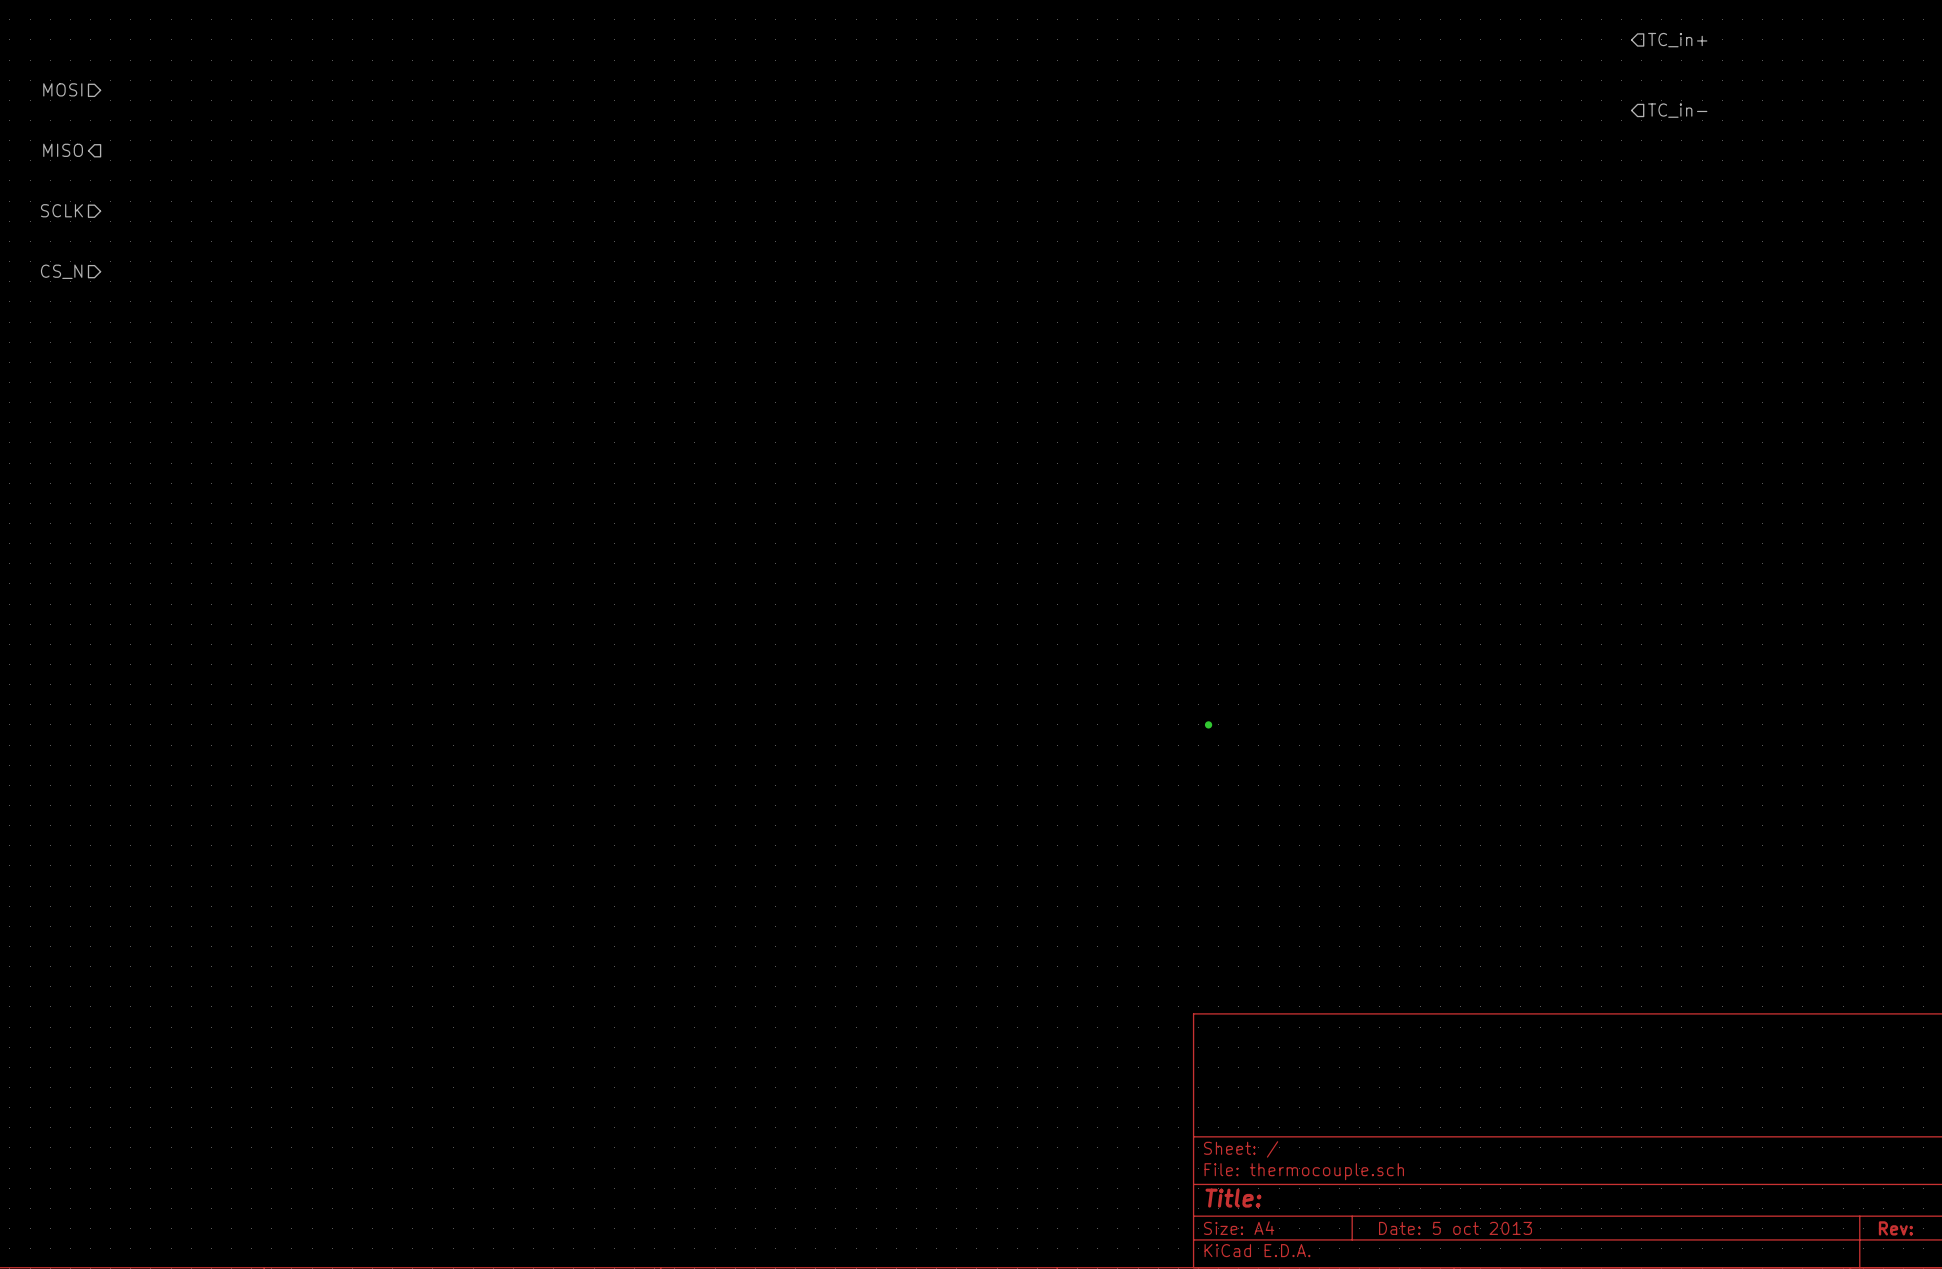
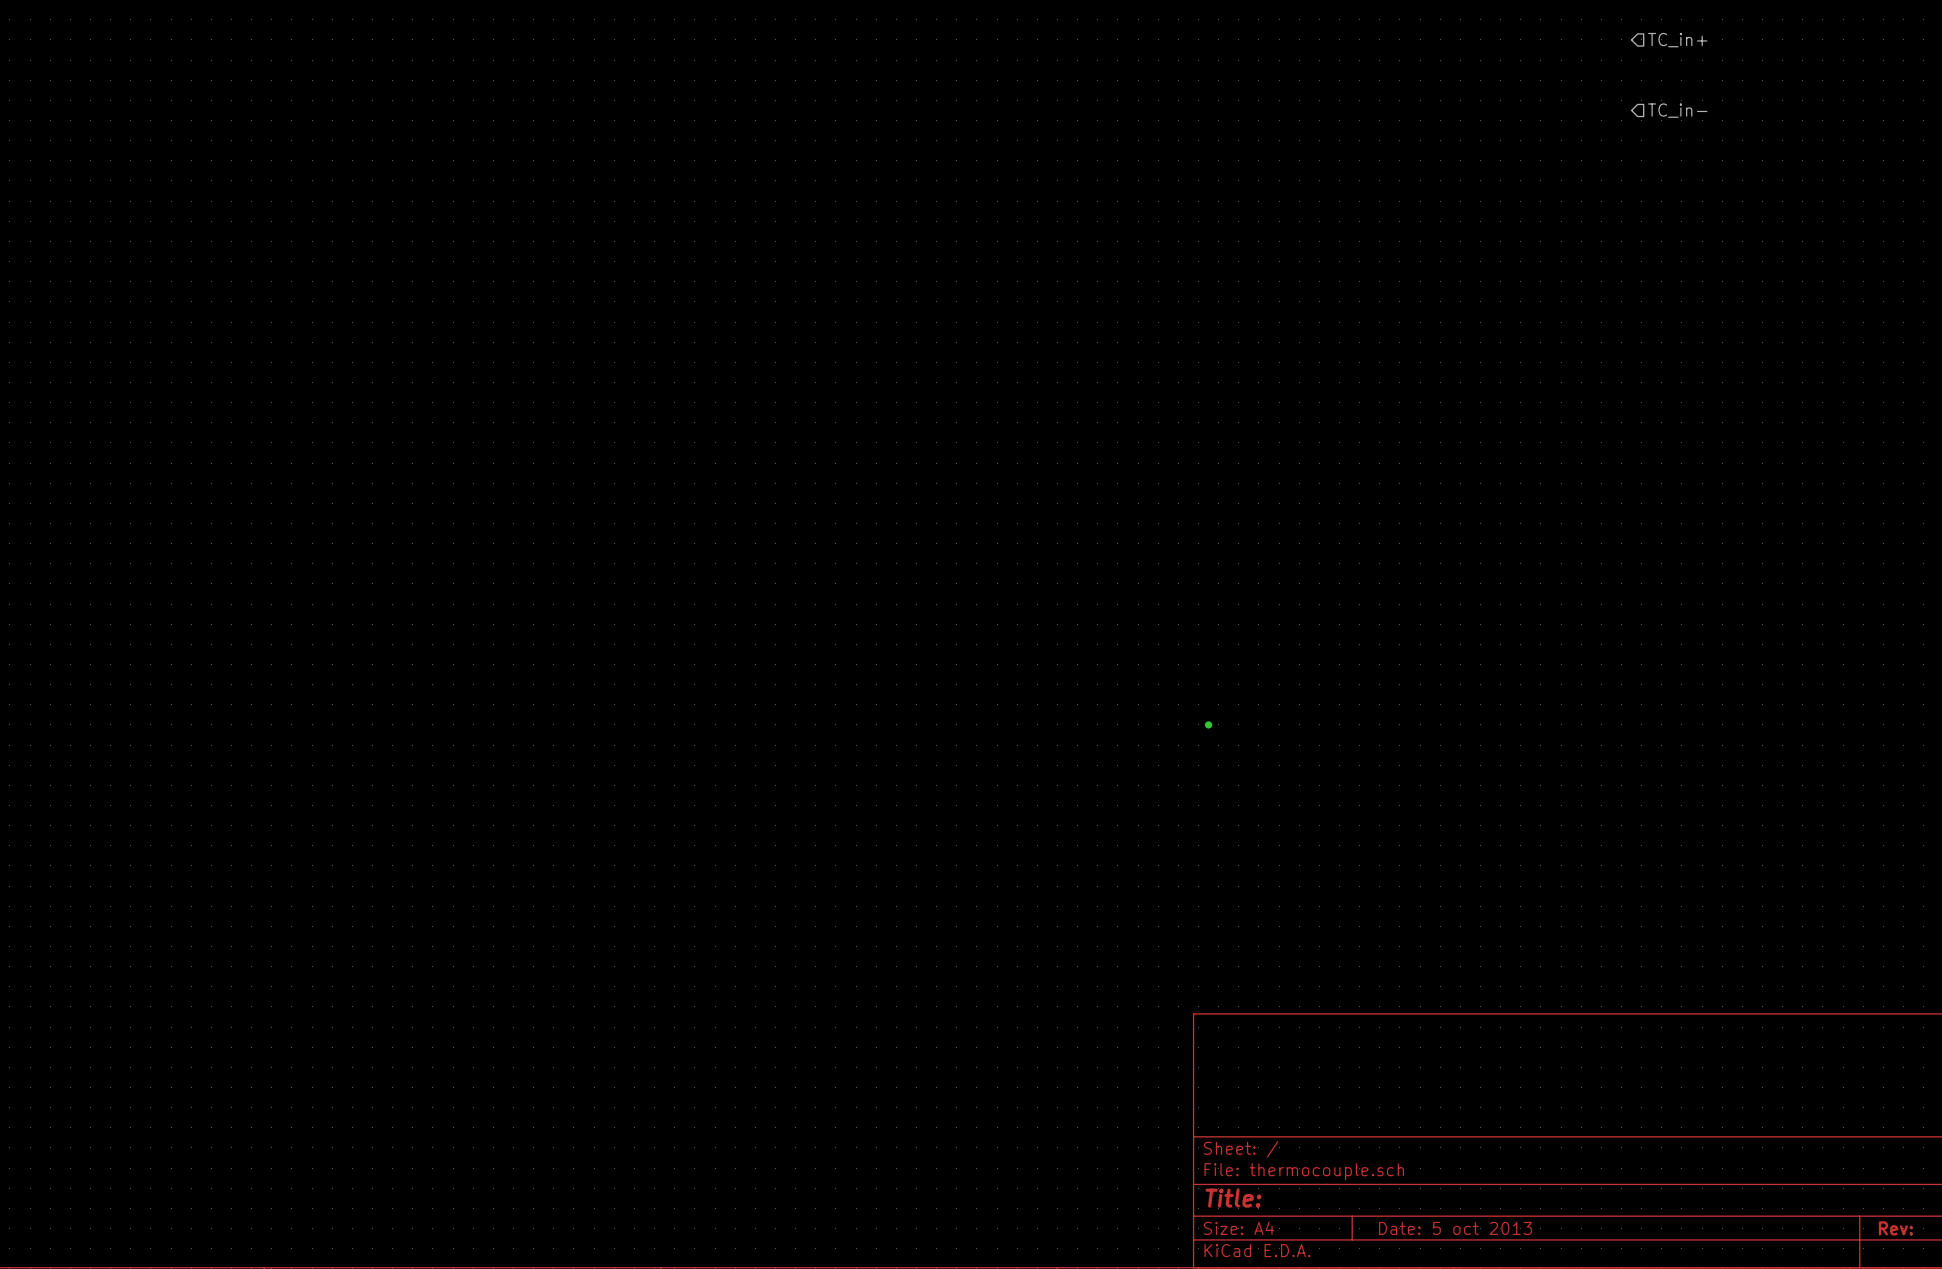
hierarchical label: MOSI (62, 89) -> none
hierarchical label: MISO (63, 150) -> none
hierarchical label: SCLK (61, 210) -> none
hierarchical label: CS_N (61, 271) -> none

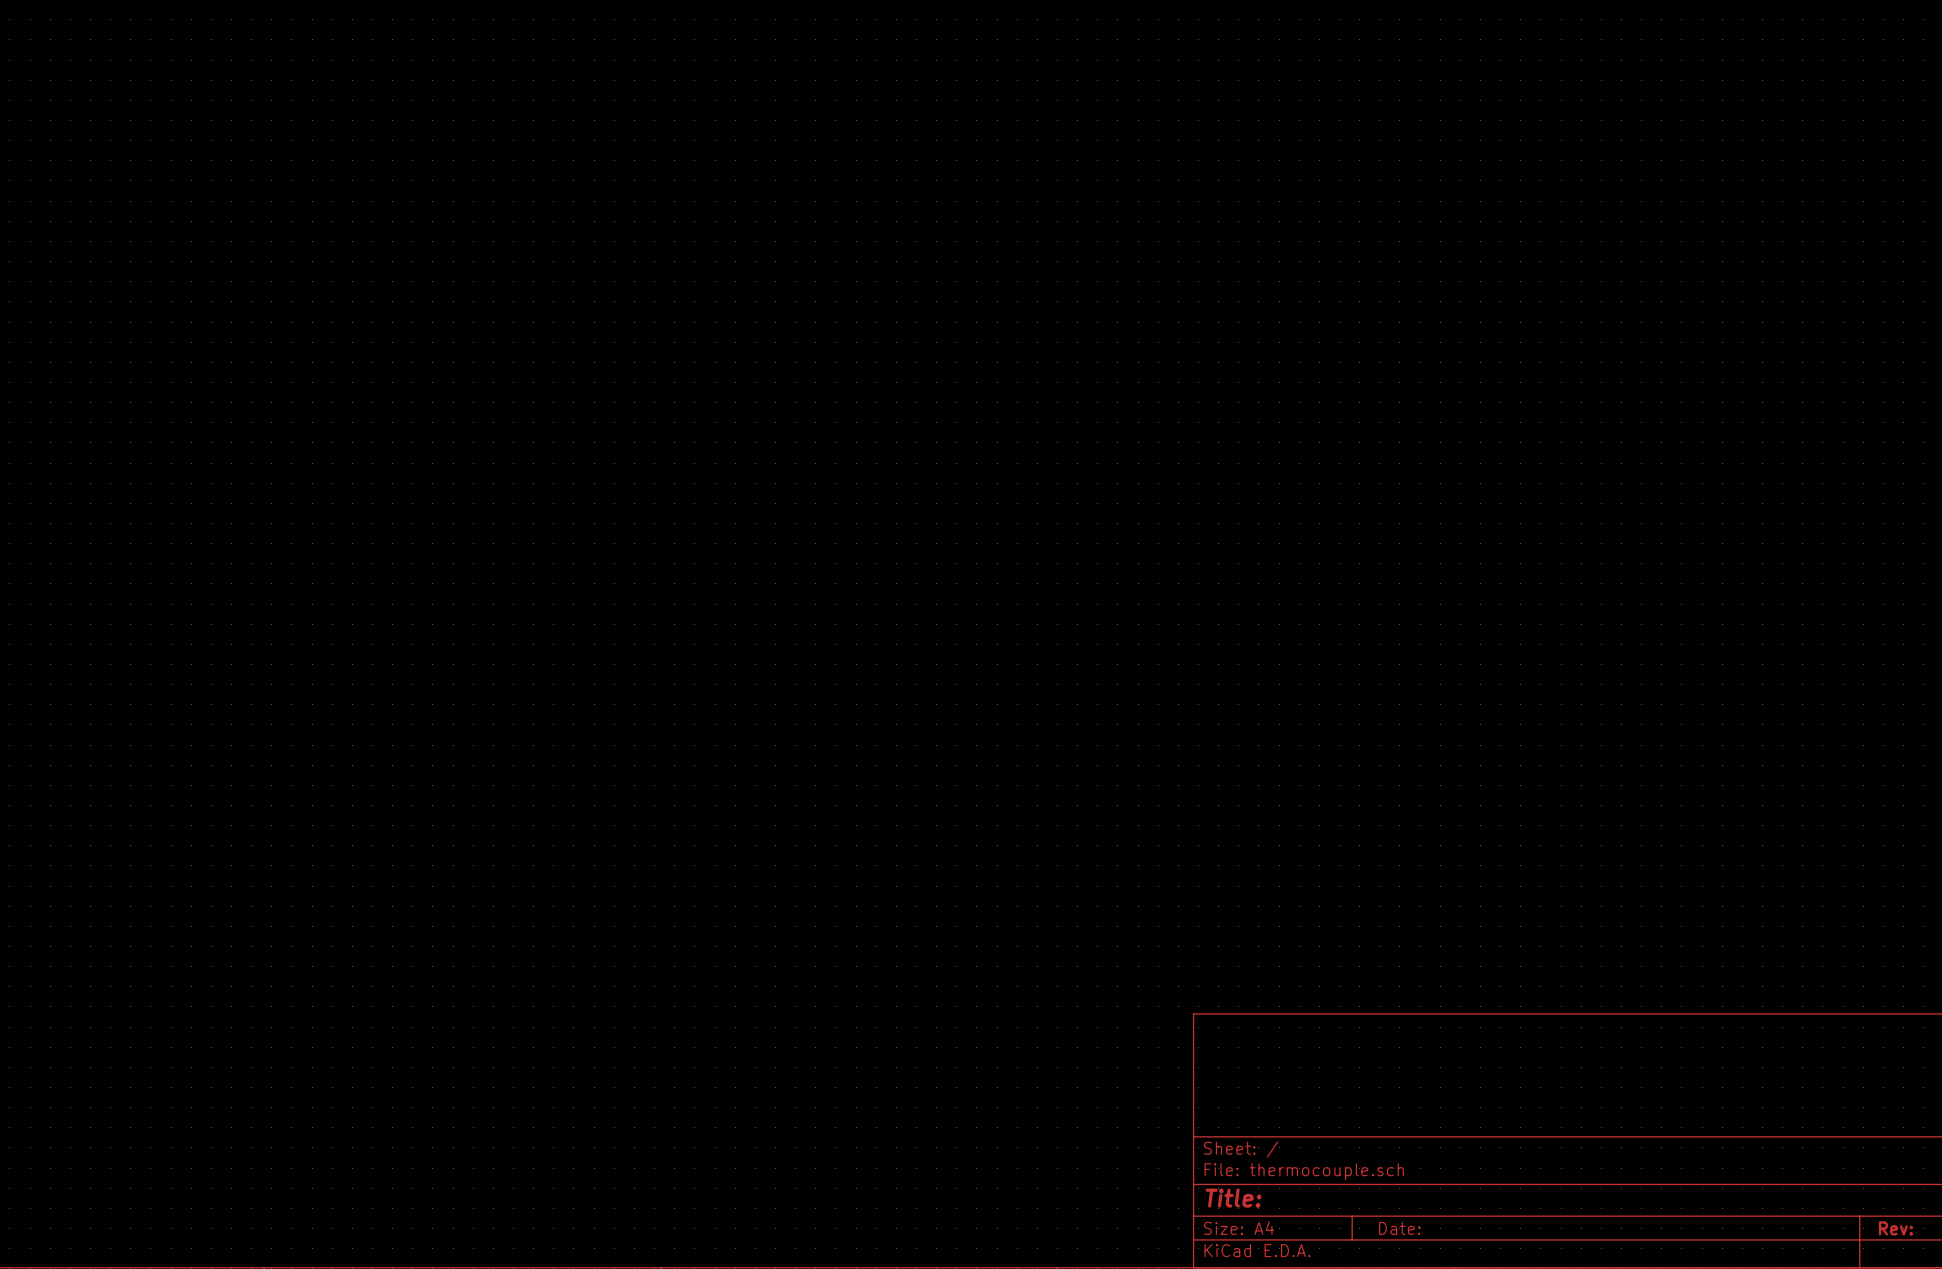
hierarchical label: TC_in+ (1677, 40) -> none
hierarchical label: TC_in- (1677, 110) -> none
junction: (1208, 724) -> none
title block: Date: 5 oct 2013 (1455, 1228) -> Date: (1399, 1228)

